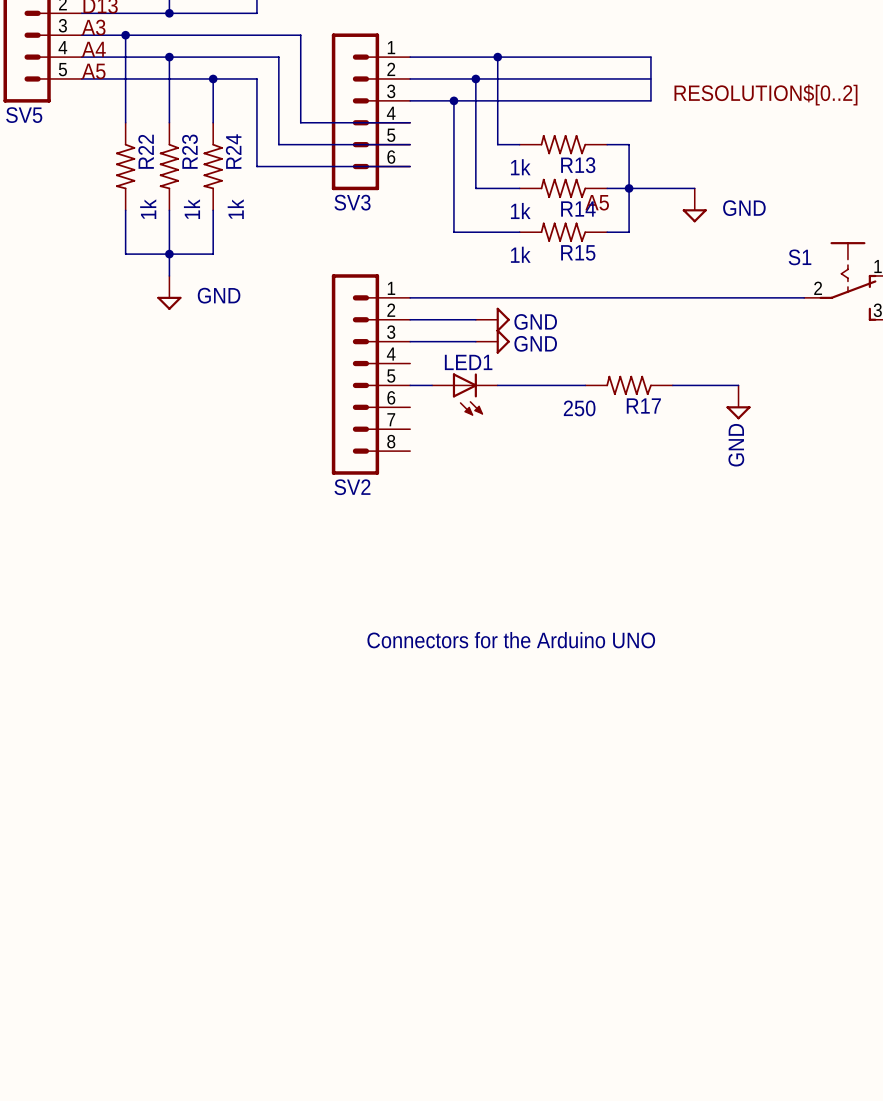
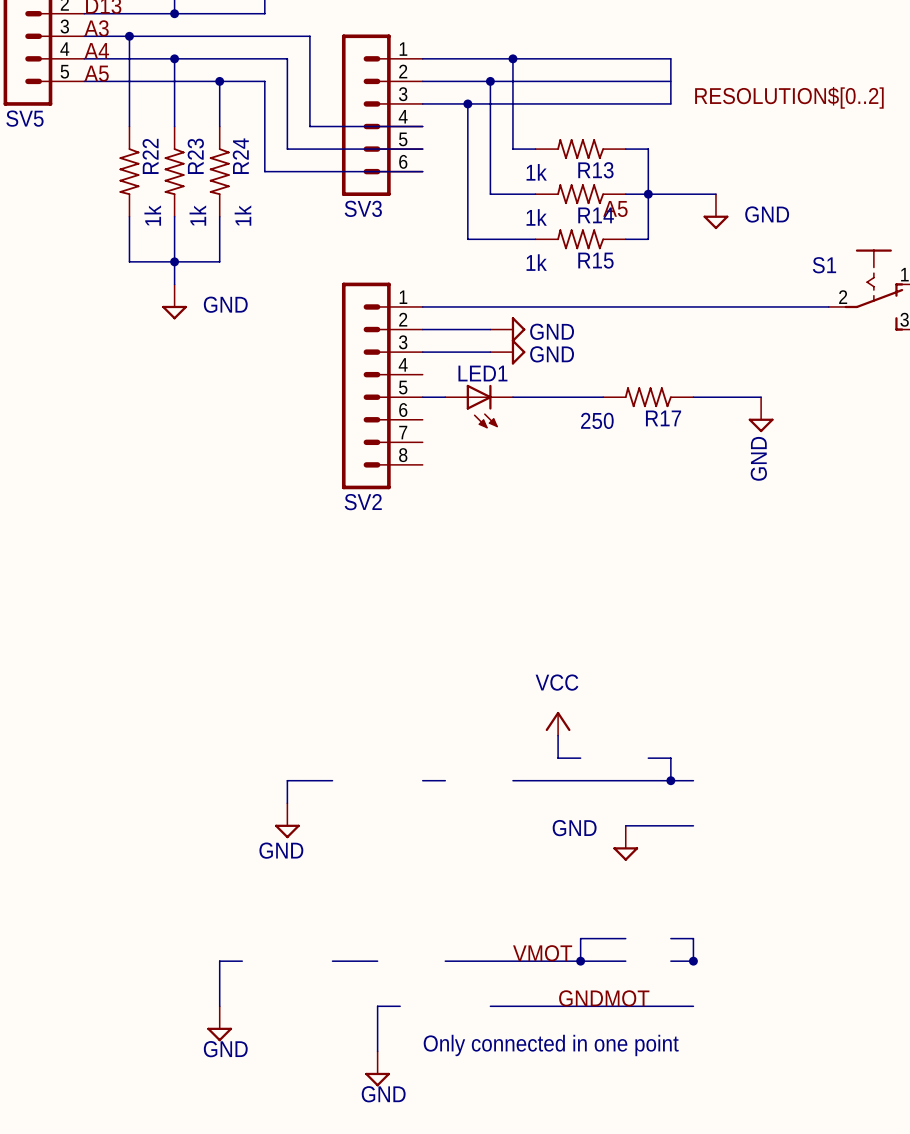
text: Connectors for the Arduino UNO (511, 640) -> none
power symbol: none -> VCC (558, 723)
wire: none -> (558, 735) (558, 758) (580, 758)
wire: none -> (648, 758) (670, 758) (670, 780)
wire: none -> (332, 780) (287, 780) (287, 803)
wire: none -> (422, 780) (445, 780)
wire: none -> (512, 780) (693, 780)
junction: none -> (670, 780)
power symbol: none -> GND (287, 820)
wire: none -> (625, 825) (693, 825)
power symbol: none -> GND (625, 843)
wire: none -> (625, 938) (580, 938) (580, 961)
wire: none -> (670, 938) (693, 938) (693, 961) (670, 961)
label: none -> VMOT (542, 953)
wire: none -> (242, 961) (219, 961) (219, 1006)
wire: none -> (332, 961) (377, 961)
wire: none -> (445, 961) (625, 961)
junction: none -> (580, 961)
junction: none -> (693, 961)
label: none -> GNDMOT (604, 998)
wire: none -> (400, 1006) (377, 1006) (377, 1051)
wire: none -> (490, 1006) (693, 1006)
power symbol: none -> GND (219, 1023)
text: none -> Only connected in one point (551, 1045)
power symbol: none -> GND (377, 1068)

